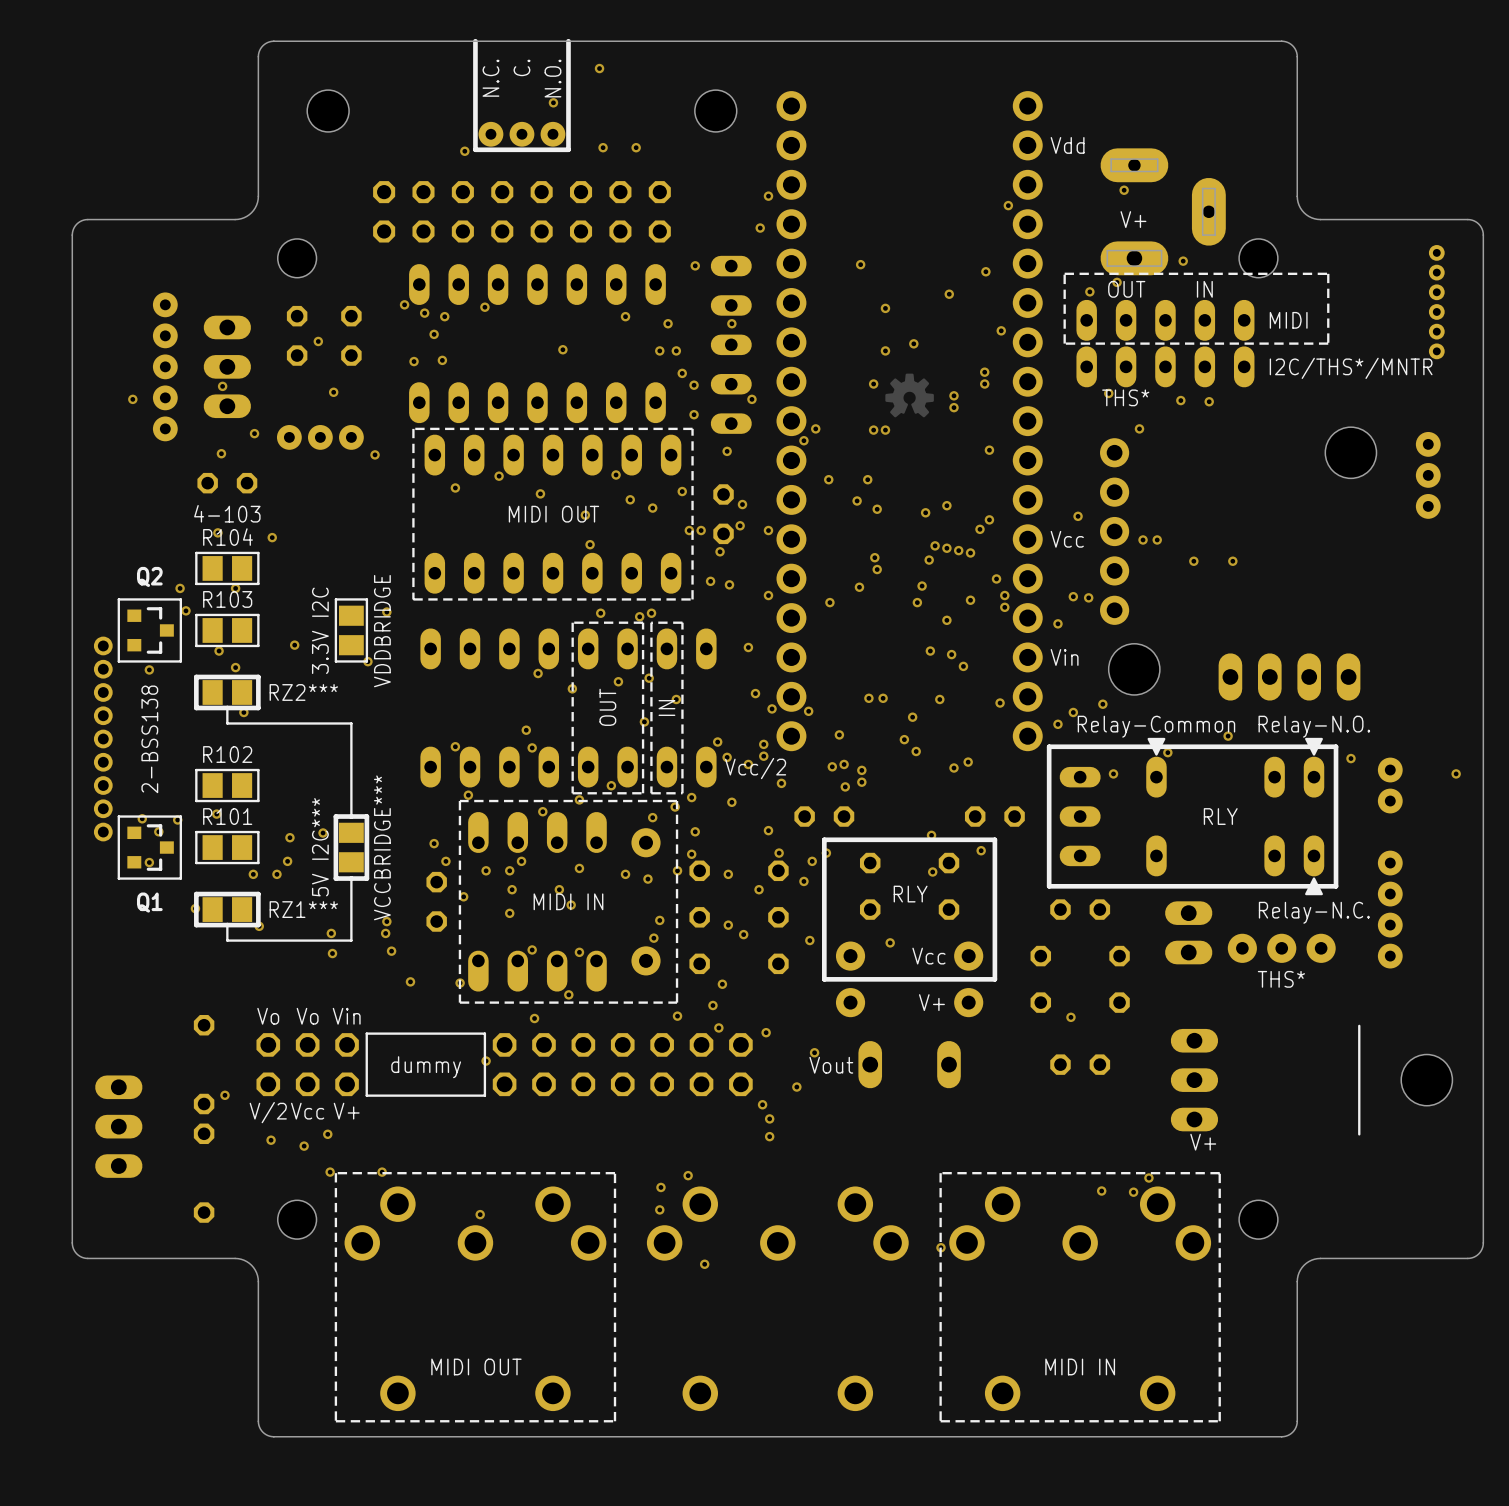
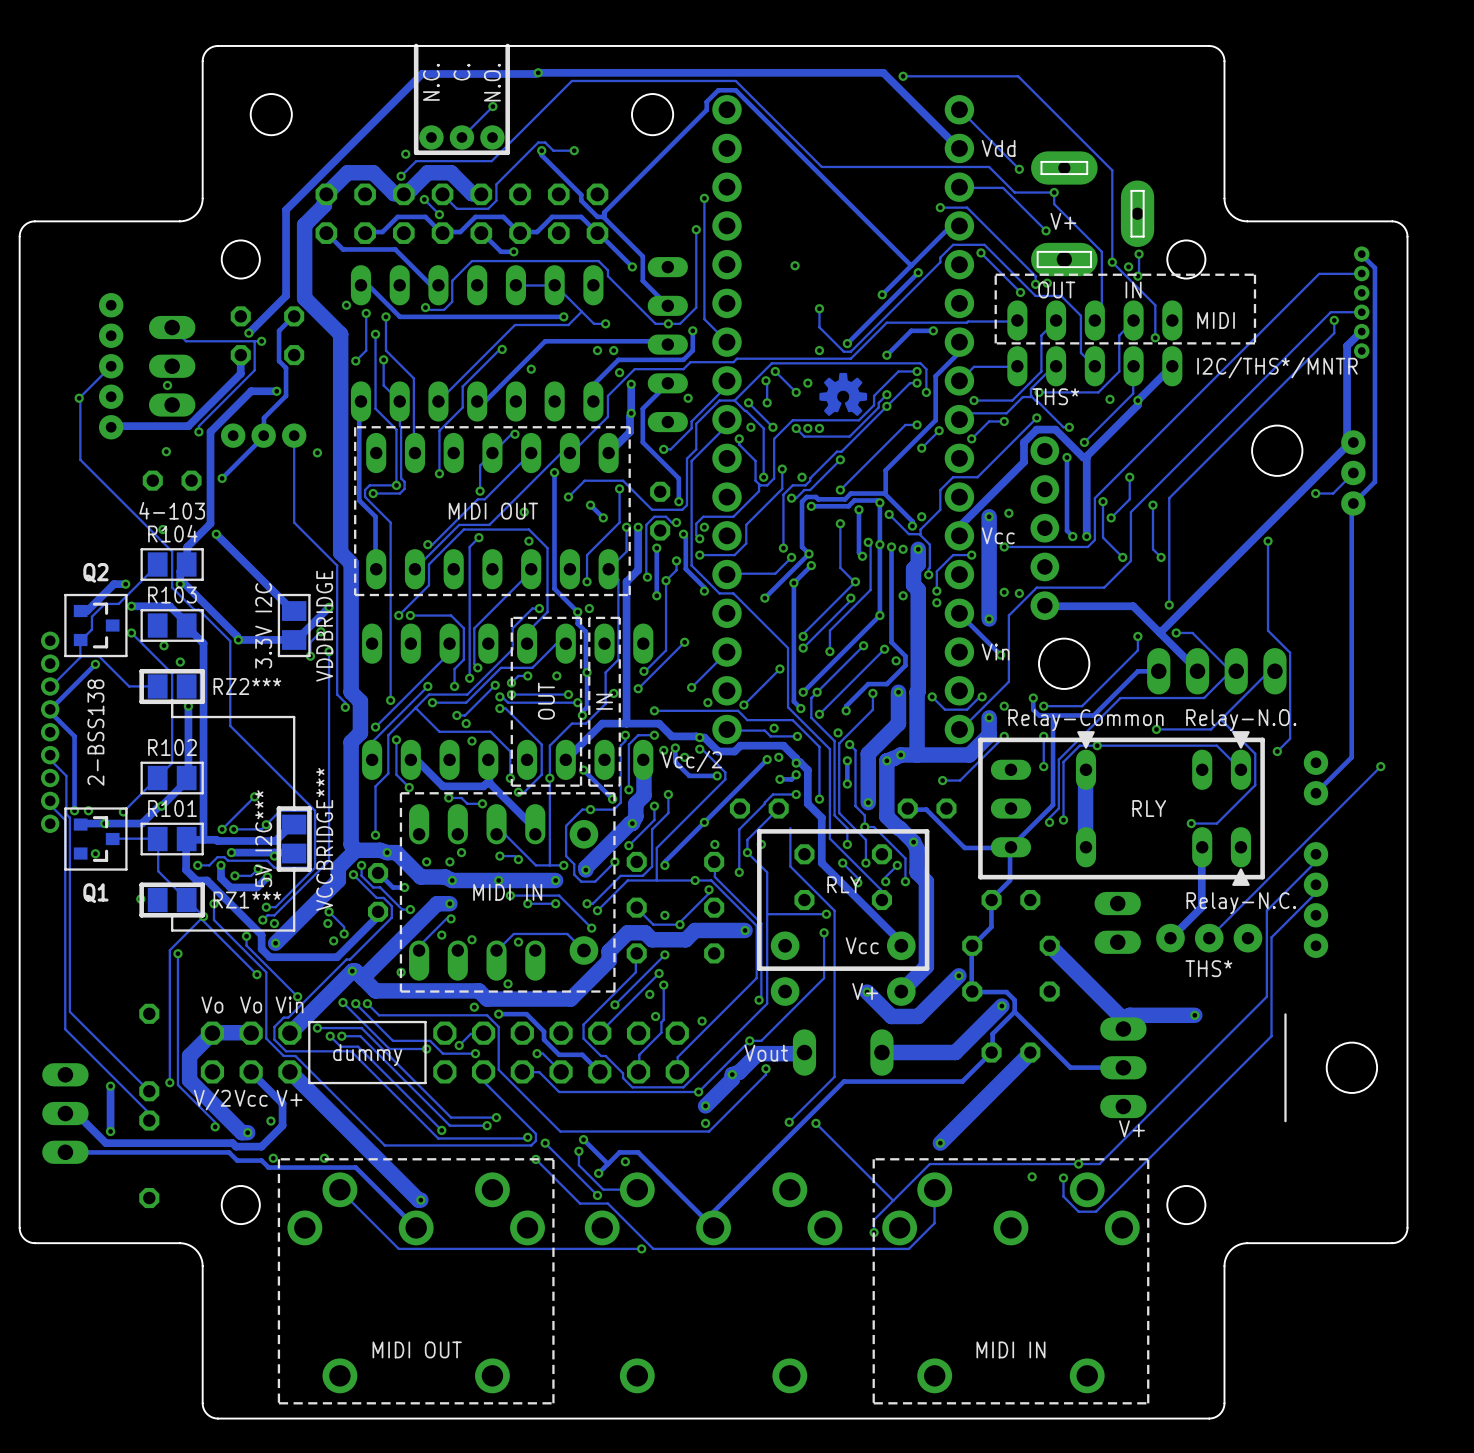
track: none -> (903, 76) (1018, 76) (1112, 170) (1112, 262) (1155, 305) (1155, 337)
via: none -> (903, 76)
track: none -> (492, 106) (461, 137)
track: none -> (959, 109) (1019, 169)
track: none -> (959, 148) (883, 72) (422, 73) (286, 209) (286, 295) (248, 333)
track: none -> (541, 150) (541, 155) (581, 194) (581, 200) (597, 216) (603, 216)
track: none -> (574, 150) (553, 150) (545, 142) (538, 142) (496, 184) (496, 200) (488, 208) (456, 208) (442, 194)
via: none -> (1019, 169)
track: none -> (401, 176) (416, 161) (491, 161) (571, 80) (735, 80) (821, 166) (989, 166) (1014, 192) (1054, 192) (1054, 204) (1101, 251) (1101, 313) (1094, 320)
via: none -> (401, 176)
track: none -> (959, 187) (1003, 187) (1046, 230)
track: none -> (481, 194) (471, 193) (451, 172) (427, 172) (403, 194) (394, 193) (373, 172) (347, 172) (326, 193) (324, 205) (304, 225) (304, 298) (340, 334) (340, 552) (351, 563) (351, 692) (360, 701) (360, 732) (351, 742) (351, 844) (355, 850)
track: none -> (704, 198) (704, 319) (727, 342)
track: none -> (424, 199) (439, 214)
via: none -> (424, 199)
track: none -> (940, 207) (967, 207) (1035, 276) (1035, 284)
via: none -> (439, 214)
track: none -> (603, 216) (642, 256) (642, 280) (667, 305)
track: none -> (603, 216) (604, 212) (706, 110) (706, 101) (718, 90) (735, 90) (911, 265)
track: none -> (959, 225) (950, 226) (882, 294)
track: none -> (696, 229) (696, 307) (680, 323) (655, 323) (607, 276) (607, 270) (598, 261) (471, 261) (452, 280) (452, 301) (444, 309) (427, 309) (425, 307)
via: none -> (1046, 230)
track: none -> (326, 233) (342, 249) (395, 249) (430, 284) (438, 285)
track: none -> (365, 233) (382, 232) (397, 216) (425, 216) (442, 233) (460, 232) (475, 216) (503, 216) (520, 233) (537, 232) (552, 216) (581, 216) (632, 266)
track: none -> (481, 233) (501, 251) (513, 251)
via: none -> (513, 251)
track: none -> (980, 252) (1020, 292)
via: none -> (980, 252)
track: none -> (1139, 254) (1137, 276)
via: none -> (1139, 254)
track: none -> (1361, 254) (1374, 268) (1374, 481) (1351, 505) (1351, 757) (1315, 793)
via: none -> (1128, 266)
track: none -> (918, 272) (847, 343)
track: none -> (1361, 273) (1319, 273) (1094, 498) (1094, 540) (1087, 546) (1004, 546)
via: none -> (1137, 276)
via: none -> (1035, 284)
track: none -> (360, 285) (368, 285) (399, 316) (563, 316)
track: none -> (515, 285) (554, 285)
track: none -> (554, 285) (594, 323) (605, 323)
track: none -> (819, 308) (819, 327) (843, 351) (850, 351) (940, 262) (940, 257) (953, 244) (984, 244) (1035, 295) (1061, 295) (1080, 315) (1080, 352) (1094, 366)
track: none -> (581, 311) (568, 325) (514, 325) (438, 401)
track: none -> (1361, 312) (1330, 312) (1130, 512) (1130, 560) (1104, 587) (1036, 587) (1008, 615) (1008, 681) (959, 729)
track: none -> (366, 313) (366, 350) (355, 361)
track: none -> (294, 316) (279, 330) (279, 361) (286, 368) (286, 395) (263, 417) (262, 437) (222, 478)
track: none -> (385, 316) (385, 350) (413, 378) (414, 453)
track: none -> (1017, 320) (886, 322) (850, 358) (736, 358) (733, 362) (690, 362) (683, 369) (634, 369) (607, 395) (607, 416) (570, 454) (560, 454) (489, 524) (459, 524) (415, 569)
track: none -> (1056, 320) (1041, 335) (1041, 371) (1012, 400) (974, 400)
track: none -> (1133, 320) (1119, 335) (1119, 371) (1098, 392) (1039, 392)
track: none -> (1334, 320) (1334, 333) (1169, 498) (1169, 605)
via: none -> (1334, 320)
track: none -> (172, 327) (186, 341) (261, 341)
track: none -> (692, 330) (692, 350) (683, 359) (618, 359) (594, 384) (593, 401)
via: none -> (692, 330)
track: none -> (933, 330) (911, 330) (886, 355)
track: none -> (1361, 331) (1347, 345) (1347, 436) (1353, 442) (1349, 443) (1159, 632)
via: none -> (248, 333)
track: none -> (375, 334) (375, 408) (396, 429) (396, 485) (369, 485) (365, 490) (365, 497) (390, 522) (390, 700)
via: none -> (1155, 337)
track: none -> (254, 341) (254, 370) (198, 426) (198, 431)
track: none -> (959, 342) (958, 352) (935, 376) (935, 420) (885, 470) (884, 493)
track: none -> (667, 344) (664, 341) (545, 341) (485, 400) (477, 401)
track: none -> (502, 349) (499, 349) (462, 386) (462, 407) (439, 430) (439, 473)
track: none -> (240, 355) (240, 373) (188, 426) (111, 427)
via: none -> (886, 355)
track: none -> (383, 359) (383, 385) (399, 401) (401, 478) (404, 481) (404, 488) (399, 493) (373, 493)
track: none -> (111, 366) (79, 398) (80, 459) (172, 551) (172, 587) (194, 609) (198, 609) (230, 641) (230, 725) (315, 810) (315, 867) (275, 907) (266, 907)
track: none -> (1017, 366) (974, 366) (959, 380)
track: none -> (1056, 366) (1053, 366) (1030, 388) (1030, 395) (1063, 427) (1069, 427)
track: none -> (1133, 366) (1133, 393) (1084, 442)
track: none -> (1172, 366) (1137, 400) (1137, 405) (1086, 456) (1086, 536)
via: none -> (531, 369)
track: none -> (775, 371) (796, 392)
via: none -> (775, 371)
track: none -> (917, 371) (898, 371) (874, 395) (874, 405) (858, 420) (792, 420) (774, 438) (774, 478) (767, 485) (760, 485) (755, 480) (755, 460) (739, 444) (739, 438)
track: none -> (727, 380) (726, 386) (691, 421) (691, 428) (670, 449) (663, 449)
track: none -> (766, 380) (767, 402)
via: none -> (766, 380)
track: none -> (667, 383) (642, 408) (642, 442) (678, 478) (678, 501)
track: none -> (917, 383) (910, 383) (841, 451) (836, 451) (805, 485) (792, 485) (783, 494) (783, 548)
track: none -> (631, 384) (630, 431) (608, 453)
track: none -> (276, 391) (251, 391) (210, 431) (210, 523) (187, 546) (186, 564) (180, 571) (180, 584) (183, 583) (237, 636) (238, 639) (297, 638) (329, 607)
via: none -> (796, 392)
track: none -> (926, 392) (926, 369) (920, 363) (771, 363) (734, 400)
via: none -> (926, 392)
track: none -> (886, 394) (878, 402) (878, 407) (849, 436) (804, 436) (796, 428)
track: none -> (1031, 396) (1022, 397) (1006, 413) (965, 413) (959, 419)
track: none -> (734, 400) (719, 400) (696, 423) (696, 449) (686, 458) (686, 505) (682, 509) (652, 509) (623, 480) (584, 480) (568, 497)
track: none -> (734, 400) (763, 428) (763, 477)
via: none -> (974, 400)
track: none -> (360, 401) (359, 402) (359, 500) (375, 516) (376, 569)
track: none -> (748, 402) (772, 427)
via: none -> (748, 402)
via: none -> (767, 402)
track: none -> (1036, 417) (977, 477) (953, 477) (940, 490) (940, 509) (920, 529) (919, 534)
via: none -> (1036, 417)
track: none -> (727, 419) (726, 426) (691, 460) (691, 565) (719, 593) (733, 593) (788, 648) (788, 707) (829, 749) (829, 838) (881, 889) (881, 900)
track: none -> (1004, 421) (989, 421) (971, 438)
via: none -> (1004, 421)
track: none -> (917, 424) (905, 424) (840, 490)
via: none -> (917, 424)
via: none -> (772, 427)
via: none -> (796, 428)
track: none -> (939, 430) (921, 448)
via: none -> (939, 430)
track: none -> (514, 434) (511, 434) (480, 465) (480, 491)
via: none -> (514, 434)
track: none -> (294, 435) (294, 522) (337, 565) (337, 694) (345, 702) (345, 707)
via: none -> (971, 438)
via: none -> (1084, 442)
track: none -> (531, 453) (484, 499) (477, 499) (432, 544) (427, 544)
track: none -> (1066, 457) (1066, 530) (1072, 536)
via: none -> (1066, 457)
track: none -> (1086, 457) (1083, 457) (1055, 429) (1036, 429) (1023, 442) (1023, 462) (960, 526) (959, 535)
track: none -> (840, 459) (810, 490) (804, 490) (796, 498) (791, 498)
via: none -> (840, 459)
track: none -> (782, 469) (782, 488) (746, 524) (746, 543) (734, 555) (699, 555)
via: none -> (782, 469)
track: none -> (554, 472) (554, 588) (577, 612) (577, 623) (585, 631) (587, 707) (582, 711) (582, 715)
track: none -> (1353, 473) (1333, 493) (1315, 493)
track: none -> (1129, 477) (1129, 499) (1111, 517)
via: none -> (1129, 477)
via: none -> (222, 478)
track: none -> (759, 484) (759, 491) (733, 516) (703, 516) (696, 523) (696, 535) (699, 538)
track: none -> (619, 488) (619, 522) (587, 555) (587, 581)
via: none -> (840, 490)
via: none -> (373, 493)
track: none -> (884, 493) (912, 521) (912, 526)
track: none -> (884, 493) (850, 493) (845, 499) (818, 499) (815, 497) (806, 497) (802, 501) (802, 546) (809, 553) (764, 598)
via: none -> (1315, 493)
track: none -> (1103, 501) (1103, 537) (1122, 557)
via: none -> (1103, 501)
track: none -> (590, 505) (603, 517)
track: none -> (1152, 505) (1152, 549) (1161, 557)
via: none -> (1152, 505)
track: none -> (811, 506) (848, 506) (854, 500) (877, 500) (879, 502) (879, 615) (803, 692)
track: none -> (858, 509) (858, 552) (862, 556)
track: none -> (889, 514) (908, 534) (919, 534) (929, 544) (928, 574)
via: none -> (889, 514)
track: none -> (989, 516) (989, 619)
via: none -> (989, 516)
via: none -> (603, 517)
via: none -> (1111, 517)
track: none -> (676, 522) (671, 522) (666, 516) (654, 516) (646, 524) (647, 577)
track: none -> (840, 523) (840, 567) (855, 581) (803, 634) (803, 636)
via: none -> (840, 523)
track: none -> (626, 527) (626, 551) (608, 569) (618, 579) (618, 659) (605, 672) (605, 703) (585, 723) (571, 723) (549, 745) (549, 865)
track: none -> (638, 527) (638, 570) (626, 581) (626, 723)
track: none -> (216, 534) (294, 611)
track: none -> (683, 534) (685, 536) (685, 569) (704, 587) (704, 591)
via: none -> (683, 534)
track: none -> (478, 537) (469, 546) (469, 678)
via: none -> (478, 537)
via: none -> (699, 538)
track: none -> (1268, 541) (1268, 630) (1290, 652) (1290, 738) (1277, 751)
via: none -> (1268, 541)
track: none -> (868, 542) (870, 544) (870, 589) (829, 630) (829, 651)
via: none -> (427, 544)
track: none -> (891, 546) (891, 642) (905, 656) (905, 665) (886, 684) (868, 684) (846, 706) (846, 710)
via: none -> (1004, 546)
track: none -> (656, 548) (656, 595)
via: none -> (783, 548)
track: none -> (918, 549) (918, 564) (913, 569) (913, 585) (918, 589) (917, 754)
via: none -> (918, 549)
via: none -> (699, 555)
track: none -> (971, 555) (953, 555) (936, 571) (936, 591)
via: none -> (971, 555)
track: none -> (791, 557) (775, 573) (727, 574)
via: none -> (791, 557)
track: none -> (676, 560) (676, 570) (666, 580) (666, 650) (643, 671)
via: none -> (676, 560)
track: none -> (157, 564) (118, 603) (104, 603) (91, 616) (91, 629) (80, 640) (80, 657) (50, 686)
track: none -> (811, 565) (793, 583) (793, 701) (800, 708)
track: none -> (531, 569) (530, 572) (474, 628) (474, 664) (477, 667)
via: none -> (587, 581)
track: none -> (125, 584) (114, 584) (87, 610) (80, 611)
via: none -> (656, 595)
track: none -> (850, 598) (850, 600) (803, 648)
via: none -> (1169, 605)
track: none -> (131, 606) (169, 606) (203, 643) (203, 839)
track: none -> (1044, 605) (1133, 606) (1197, 671)
track: none -> (539, 608) (532, 608) (512, 628) (512, 649) (467, 694) (428, 694) (388, 735) (388, 773) (375, 786) (375, 835)
track: none -> (959, 613) (1000, 655)
track: none -> (398, 615) (428, 585) (428, 564) (463, 529) (528, 529) (547, 548) (547, 612) (527, 631) (527, 643)
via: none -> (398, 615)
track: none -> (410, 615) (451, 615) (463, 628) (463, 659) (454, 668) (454, 686)
via: none -> (410, 615)
track: none -> (320, 631) (310, 642) (310, 656)
via: none -> (320, 631)
track: none -> (131, 632) (172, 673) (172, 763) (123, 811)
via: none -> (131, 632)
track: none -> (1176, 632) (1192, 632) (1229, 670) (1236, 671) (1228, 670) (1228, 673) (1204, 698) (1120, 698) (1058, 759) (1058, 808) (1049, 817) (1049, 822)
via: none -> (1176, 632)
via: none -> (803, 636)
track: none -> (1137, 636) (1137, 650) (1082, 706) (1043, 706)
via: none -> (1137, 636)
track: none -> (684, 642) (638, 688)
track: none -> (449, 643) (448, 653) (375, 727)
track: none -> (565, 643) (555, 644) (532, 667) (501, 667) (466, 702) (432, 702)
track: none -> (863, 645) (811, 698) (811, 717) (834, 741) (834, 815) (847, 828) (847, 844)
via: none -> (803, 648)
track: none -> (884, 649) (819, 714)
track: none -> (329, 651) (329, 860) (274, 915) (267, 915) (262, 920)
via: none -> (329, 651)
via: none -> (829, 651)
track: none -> (727, 652) (691, 687)
via: none -> (1000, 655)
track: none -> (80, 656) (98, 656) (129, 686) (157, 686)
track: none -> (95, 664) (50, 709) (51, 713) (74, 736) (74, 810)
track: none -> (779, 668) (743, 705)
via: none -> (779, 668)
track: none -> (1158, 671) (1137, 671) (1093, 715) (1039, 715) (1033, 709) (1033, 698)
track: none -> (1274, 671) (1269, 671) (1211, 729) (1156, 729)
via: none -> (643, 671)
track: none -> (527, 675) (518, 675) (511, 682)
via: none -> (527, 675)
via: none -> (469, 678)
track: none -> (495, 685) (465, 715) (456, 715)
via: none -> (495, 685)
track: none -> (427, 686) (373, 741) (372, 759)
via: none -> (427, 686)
via: none -> (454, 686)
via: none -> (638, 688)
track: none -> (898, 692) (898, 723) (868, 753) (868, 802)
via: none -> (898, 692)
track: none -> (872, 693) (872, 709) (839, 743) (839, 813) (865, 839) (865, 863)
via: none -> (511, 694)
track: none -> (568, 694) (511, 694)
via: none -> (568, 694)
track: none -> (499, 696) (508, 702) (577, 702)
via: none -> (499, 696)
track: none -> (982, 696) (979, 696) (967, 709) (944, 709) (932, 696)
via: none -> (982, 696)
via: none -> (390, 700)
via: none -> (432, 702)
via: none -> (577, 702)
track: none -> (188, 706) (188, 775) (186, 781) (141, 823) (80, 824)
via: none -> (1043, 706)
via: none -> (345, 707)
track: none -> (415, 707) (439, 731) (490, 731) (510, 751) (510, 778)
track: none -> (499, 708) (505, 708) (541, 744) (541, 774) (524, 792) (518, 792)
via: none -> (499, 708)
via: none -> (800, 708)
track: none -> (654, 710) (738, 710) (747, 720) (792, 720) (819, 746) (819, 799)
via: none -> (654, 710)
via: none -> (819, 714)
via: none -> (456, 715)
track: none -> (1053, 715) (1053, 804) (1010, 847)
track: none -> (989, 717) (989, 735) (969, 754) (900, 754) (886, 760) (886, 816) (913, 842) (917, 849) (917, 872) (926, 881) (926, 966) (901, 991)
track: none -> (1220, 719) (1255, 753) (1255, 785) (1216, 823) (1191, 823)
via: none -> (375, 727)
track: none -> (727, 729) (764, 730) (770, 736) (797, 736)
track: none -> (625, 735) (625, 741) (620, 745) (620, 802) (613, 809) (582, 809) (566, 825) (566, 856) (574, 864) (574, 874) (581, 881) (595, 881) (614, 861)
via: none -> (625, 735)
track: none -> (654, 735) (638, 735) (628, 744) (628, 789)
via: none -> (797, 736)
track: none -> (1004, 736) (960, 780) (942, 780)
via: none -> (1004, 736)
track: none -> (1043, 736) (1043, 766)
via: none -> (1043, 736)
track: none -> (396, 739) (396, 774) (409, 787)
track: none -> (849, 744) (855, 750) (855, 806) (864, 815) (864, 827) (874, 827) (905, 858) (905, 881)
track: none -> (675, 748) (675, 761) (689, 775) (717, 775)
via: none -> (675, 748)
track: none -> (699, 749) (702, 749) (725, 772) (725, 779) (656, 847) (656, 880)
track: none -> (50, 755) (51, 760) (66, 775) (66, 814) (69, 817) (69, 1011) (149, 1091)
track: none -> (767, 759) (664, 861) (664, 865)
track: none -> (410, 759) (417, 760) (442, 786) (483, 786) (489, 782)
track: none -> (565, 759) (602, 723) (659, 723) (671, 736) (704, 737) (718, 751) (734, 751) (740, 745) (783, 745) (796, 758) (796, 763) (799, 761) (807, 770) (807, 803) (821, 817) (821, 863) (900, 942) (901, 945)
track: none -> (643, 759) (643, 795) (635, 803) (635, 816) (632, 823) (630, 823) (585, 867) (585, 870)
track: none -> (847, 760) (847, 784)
via: none -> (847, 760)
track: none -> (1380, 766) (1209, 938)
track: none -> (583, 770) (612, 799)
via: none -> (583, 770)
track: none -> (1086, 769) (1086, 847)
track: none -> (1240, 769) (1216, 745) (1079, 745) (1063, 761) (1063, 820)
track: none -> (796, 774) (791, 779) (779, 779)
via: none -> (510, 778)
via: none -> (942, 780)
track: none -> (489, 782) (534, 828) (535, 834)
via: none -> (847, 784)
track: none -> (668, 794) (668, 813) (652, 829) (652, 866) (642, 875) (620, 875) (592, 903) (587, 903)
track: none -> (796, 794) (772, 794) (739, 829) (739, 872)
via: none -> (796, 794)
track: none -> (254, 796) (222, 829)
via: none -> (254, 796)
track: none -> (448, 797) (461, 797) (467, 803) (482, 803)
via: none -> (448, 797)
via: none -> (819, 799)
track: none -> (50, 800) (51, 806) (65, 820) (65, 1029) (148, 1112) (149, 1120)
via: none -> (868, 802)
track: none -> (654, 806) (654, 820) (628, 845)
via: none -> (654, 806)
track: none -> (778, 808) (747, 839) (747, 852) (767, 872) (767, 1003) (683, 1087) (632, 1087) (623, 1078) (623, 1073) (605, 1055) (600, 1055) (583, 1038) (583, 1024) (635, 972) (636, 953)
track: none -> (907, 808) (926, 809) (964, 847) (1010, 847)
via: none -> (74, 810)
via: none -> (1063, 820)
via: none -> (1049, 822)
via: none -> (1191, 823)
track: none -> (294, 824) (293, 823) (275, 840) (186, 839) (186, 870) (196, 880) (207, 880) (261, 935) (261, 949) (269, 957) (337, 957) (377, 916) (377, 911)
track: none -> (790, 828) (790, 866) (834, 910) (834, 1076) (789, 1122)
via: none -> (222, 829)
track: none -> (233, 829) (261, 829) (280, 810) (308, 810) (310, 813) (310, 865) (308, 867) (274, 867) (267, 860) (227, 860) (224, 857) (217, 857) (209, 865) (197, 865)
track: none -> (496, 834) (505, 835) (535, 865) (563, 865)
track: none -> (112, 839) (157, 839) (158, 871) (203, 916) (169, 950) (169, 1082)
via: none -> (847, 844)
track: none -> (1010, 847) (1010, 880) (991, 900)
track: none -> (1202, 847) (1201, 907) (1170, 938)
track: none -> (355, 850) (338, 867) (338, 880) (275, 943)
track: none -> (355, 850) (396, 852) (420, 877) (445, 877) (452, 880) (555, 880)
track: none -> (231, 852) (294, 853)
track: none -> (1315, 854) (1315, 861) (1266, 910) (1266, 996) (1099, 1164) (929, 1164) (874, 1219) (874, 1232)
via: none -> (274, 856)
track: none -> (499, 856) (514, 856) (518, 859)
via: none -> (499, 856)
track: none -> (714, 861) (714, 877) (761, 923) (761, 997) (759, 1000)
track: none -> (842, 863) (857, 878) (857, 882)
via: none -> (842, 863)
track: none -> (220, 865) (220, 878) (230, 887) (256, 887) (267, 877)
track: none -> (361, 865) (361, 875) (373, 887) (380, 887) (402, 909) (410, 909)
via: none -> (361, 865)
track: none -> (897, 865) (885, 877) (885, 881)
via: none -> (897, 865)
track: none -> (258, 868) (251, 875) (234, 875)
via: none -> (258, 868)
track: none -> (378, 873) (392, 887) (404, 887)
track: none -> (353, 874) (376, 897) (383, 897) (391, 906) (391, 917) (288, 1017) (283, 1017) (274, 1026) (274, 1039) (286, 1051) (351, 1051) (438, 1138) (527, 1137)
via: none -> (353, 874)
via: none -> (234, 875)
via: none -> (267, 877)
via: none -> (555, 880)
via: none -> (885, 881)
via: none -> (905, 881)
via: none -> (857, 882)
track: none -> (1315, 884) (1315, 893) (1271, 937) (1271, 1036) (1096, 1211) (1078, 1211) (1063, 1196) (1063, 1178)
track: none -> (709, 889) (709, 893) (677, 924)
via: none -> (709, 889)
track: none -> (510, 895) (559, 895) (591, 928)
track: none -> (991, 900) (991, 926) (971, 946) (971, 989) (972, 992) (1006, 992) (1014, 1000) (1014, 1011)
track: none -> (214, 903) (214, 920) (266, 972) (266, 1038) (283, 1055) (295, 1055) (384, 1145) (531, 1145) (535, 1140) (535, 1133) (483, 1081) (483, 1071)
via: none -> (214, 903)
track: none -> (449, 903) (437, 903) (362, 978)
via: none -> (527, 903)
track: none -> (555, 903) (527, 903)
via: none -> (555, 903)
via: none -> (587, 903)
via: none -> (266, 907)
track: none -> (636, 907) (653, 924) (680, 924)
via: none -> (410, 909)
track: none -> (597, 910) (627, 880) (711, 880) (756, 925) (756, 978) (677, 1057) (677, 1071)
track: none -> (329, 911) (344, 926) (344, 933)
track: none -> (826, 914) (767, 914)
via: none -> (826, 914)
track: none -> (201, 918) (256, 974)
track: none -> (451, 918) (446, 918) (419, 945) (419, 950)
via: none -> (451, 918)
via: none -> (262, 920)
track: none -> (745, 930) (695, 930) (685, 939) (652, 939) (645, 932) (627, 932) (609, 951) (609, 960) (570, 999) (487, 999) (478, 990) (375, 990) (355, 971) (352, 971) (289, 1033)
track: none -> (824, 932) (824, 978) (761, 1040) (749, 1040) (698, 1092) (559, 1092) (539, 1072) (522, 1071)
via: none -> (344, 933)
via: none -> (441, 935)
track: none -> (246, 936) (246, 945) (297, 996)
via: none -> (246, 936)
track: none -> (1049, 945) (1122, 1018)
track: none -> (583, 950) (567, 933) (513, 933) (496, 950)
track: none -> (177, 953) (177, 1085) (215, 1122) (215, 1126)
via: none -> (177, 953)
track: none -> (664, 954) (614, 1004)
via: none -> (664, 954)
track: none -> (659, 973) (599, 1033)
via: none -> (256, 974)
track: none -> (958, 975) (918, 1016) (891, 1016) (867, 992)
via: none -> (958, 975)
track: none -> (663, 985) (663, 1019) (661, 1022) (661, 1032) (639, 1054) (638, 1071)
via: none -> (663, 985)
via: none -> (867, 992)
via: none -> (297, 996)
via: none -> (759, 1000)
track: none -> (342, 1002) (389, 1049) (426, 1049)
via: none -> (342, 1002)
track: none -> (355, 1003) (392, 1040) (430, 1040) (442, 1053) (475, 1053)
via: none -> (355, 1003)
track: none -> (367, 1003) (379, 1015) (487, 1015) (498, 1026) (498, 1069) (560, 1131) (709, 1131) (766, 1074) (766, 1068)
via: none -> (367, 1003)
track: none -> (1001, 1006) (955, 1052) (882, 1052)
track: none -> (1014, 1011) (992, 1033) (992, 1052) (962, 1081) (843, 1081) (706, 1218) (713, 1227) (638, 1152) (619, 1152) (598, 1173)
track: none -> (1014, 1011) (1070, 1067) (1123, 1067)
track: none -> (498, 1014) (526, 1014) (544, 1031) (544, 1039) (559, 1054) (582, 1054) (599, 1071)
via: none -> (498, 1014)
track: none -> (1194, 1015) (1129, 1015) (1122, 1018)
via: none -> (1194, 1015)
track: none -> (317, 1028) (361, 1028) (451, 1117) (496, 1117)
via: none -> (317, 1028)
track: none -> (251, 1033) (212, 1033) (189, 1055) (189, 1080) (241, 1132) (247, 1132)
track: none -> (483, 1033) (470, 1033) (459, 1045)
track: none -> (330, 1036) (340, 1046) (358, 1046) (441, 1130)
via: none -> (330, 1036)
track: none -> (341, 1036) (360, 1036) (449, 1125) (487, 1125)
via: none -> (341, 1036)
via: none -> (459, 1045)
track: none -> (804, 1052) (757, 1053) (739, 1072) (732, 1074) (732, 1079) (705, 1105)
track: none -> (1030, 1052) (940, 1143)
via: none -> (475, 1053)
track: none -> (537, 1053) (542, 1053) (561, 1071)
via: none -> (537, 1053)
via: none -> (766, 1068)
track: none -> (251, 1071) (282, 1103) (282, 1125) (261, 1146) (236, 1146) (232, 1143) (105, 1143) (76, 1114) (65, 1113)
track: none -> (289, 1071) (418, 1200) (420, 1200)
track: none -> (110, 1086) (110, 1131)
via: none -> (110, 1086)
via: none -> (496, 1117)
via: none -> (789, 1122)
track: none -> (815, 1123) (893, 1200)
via: none -> (815, 1123)
via: none -> (487, 1125)
via: none -> (441, 1130)
via: none -> (110, 1131)
via: none -> (527, 1137)
track: none -> (583, 1139) (607, 1164)
via: none -> (583, 1139)
track: none -> (545, 1143) (597, 1195)
via: none -> (545, 1143)
via: none -> (940, 1143)
track: none -> (578, 1151) (578, 1165) (603, 1189) (637, 1189)
via: none -> (578, 1151)
track: none -> (65, 1152) (229, 1152) (237, 1160) (261, 1160) (268, 1167) (355, 1167) (416, 1227)
track: none -> (535, 1159) (580, 1203) (607, 1203) (653, 1248) (908, 1248) (934, 1223) (934, 1189)
via: none -> (535, 1159)
track: none -> (339, 1189) (398, 1248) (641, 1248)

